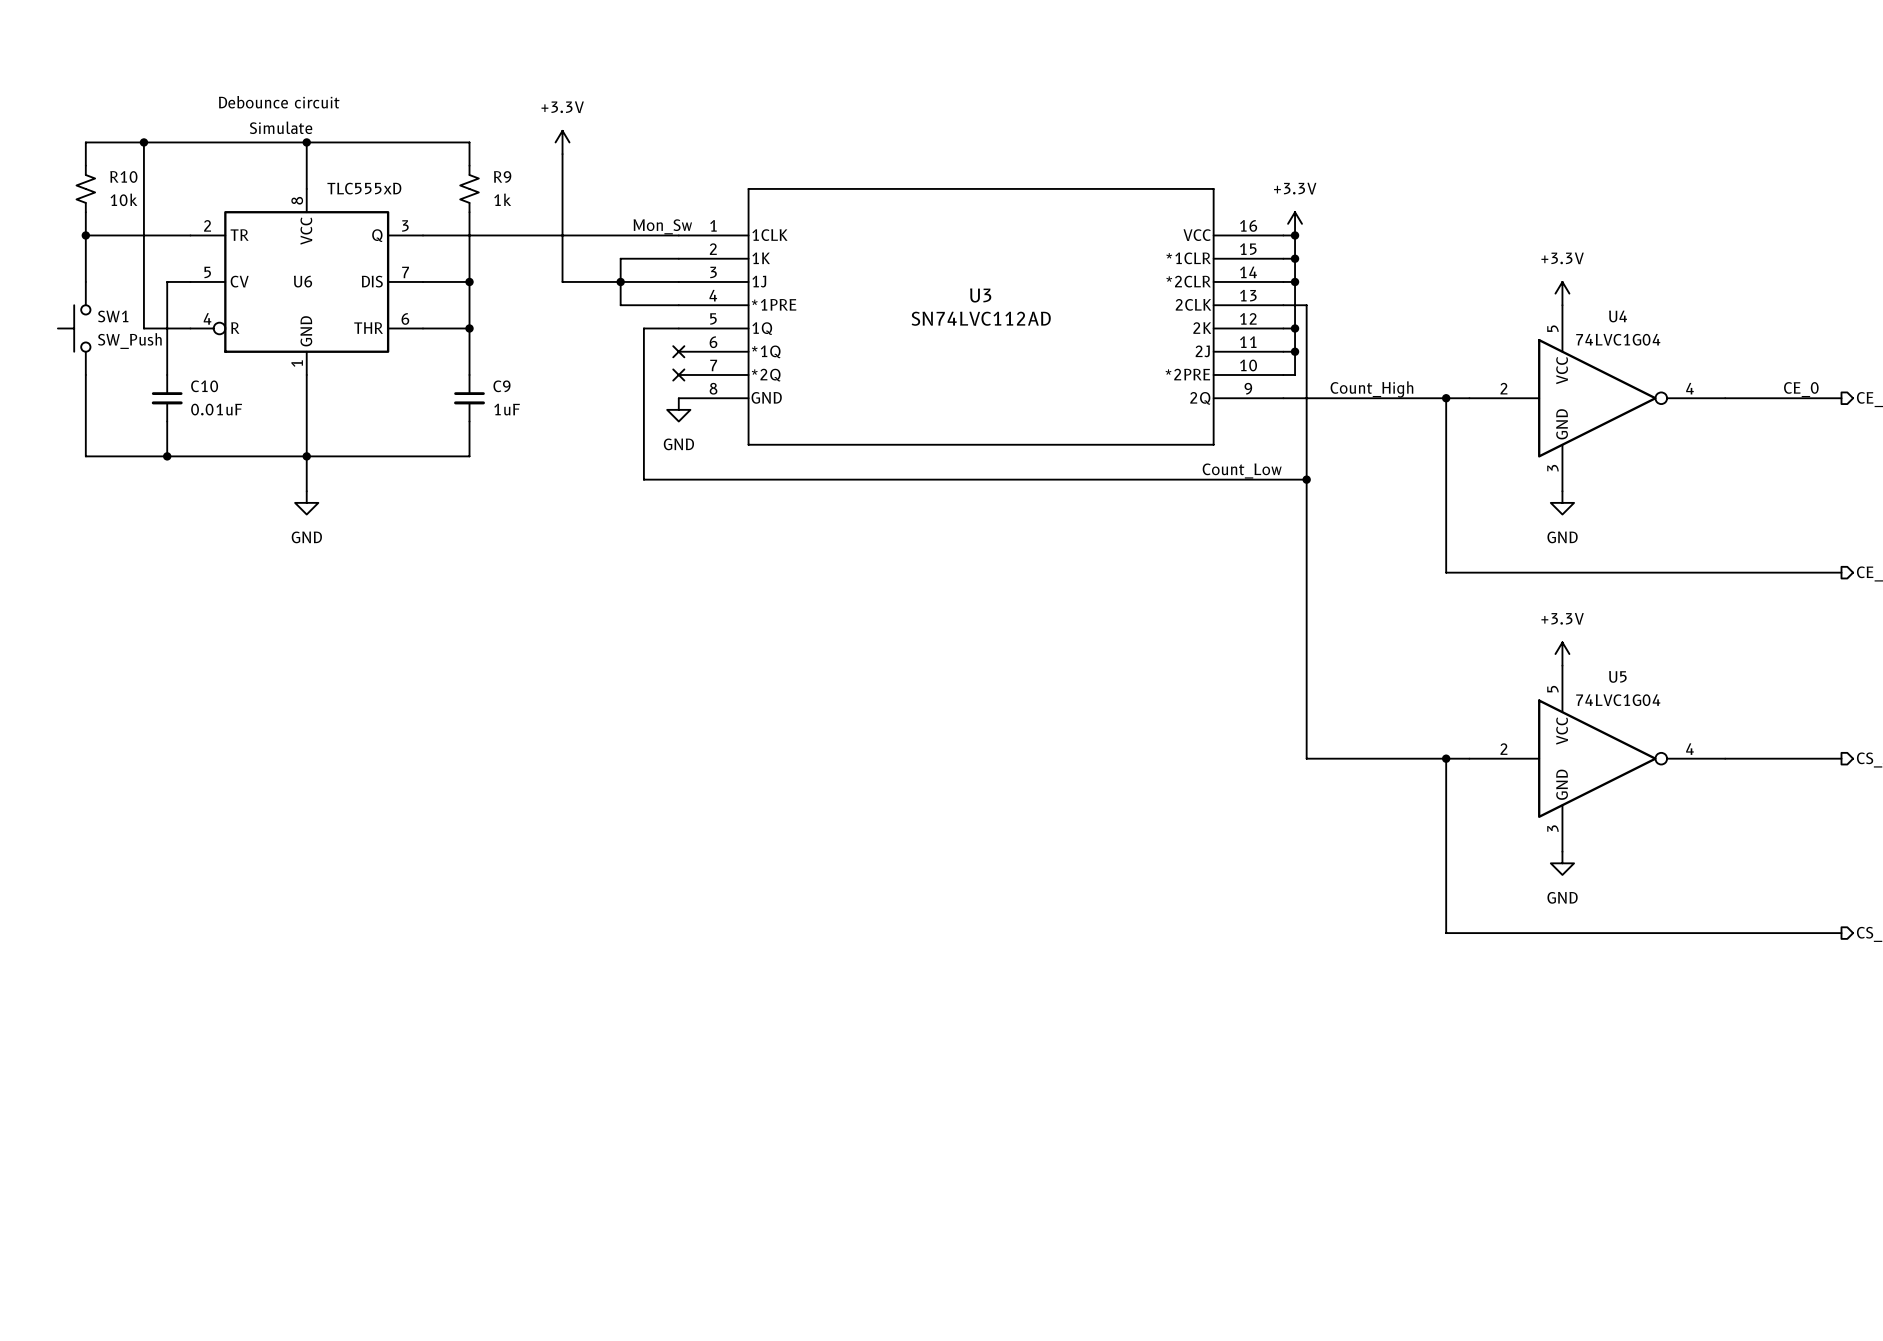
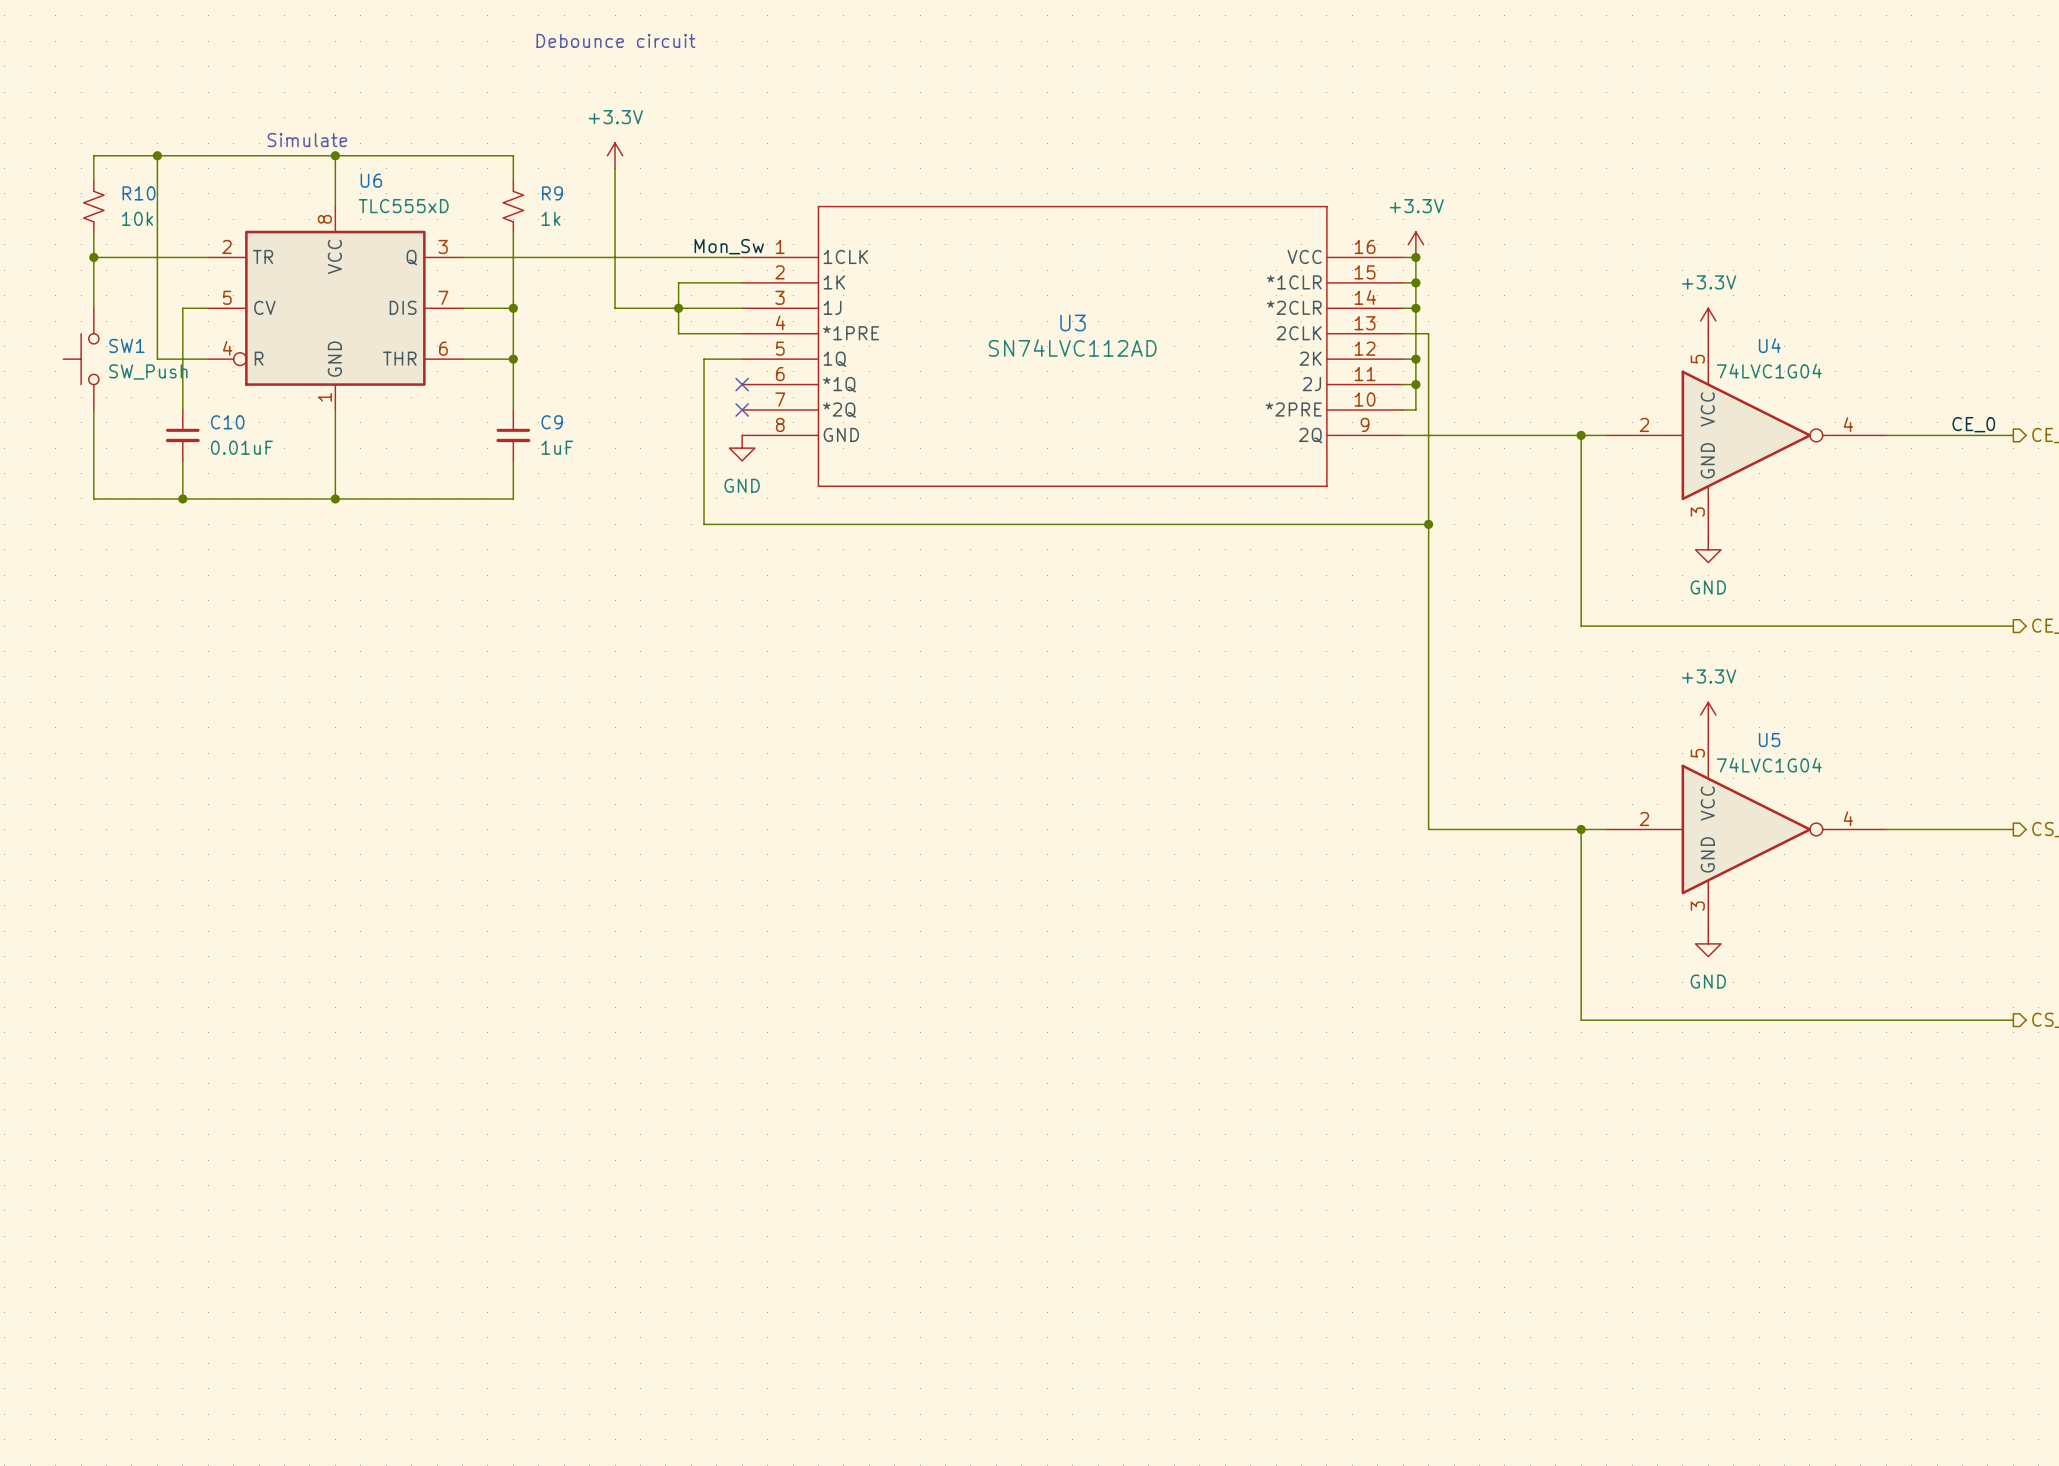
text: none -> Debounce circuit (615, 40)
text: Debounce circuit (279, 102) -> none
U6 name position: U6 (303, 281) -> U6 (371, 180)
label: Count_High (1371, 389) -> none
wire: (306, 456) (306, 491) -> none
label: Count_Low (1242, 471) -> none
power symbol: GND (306, 502) -> none

